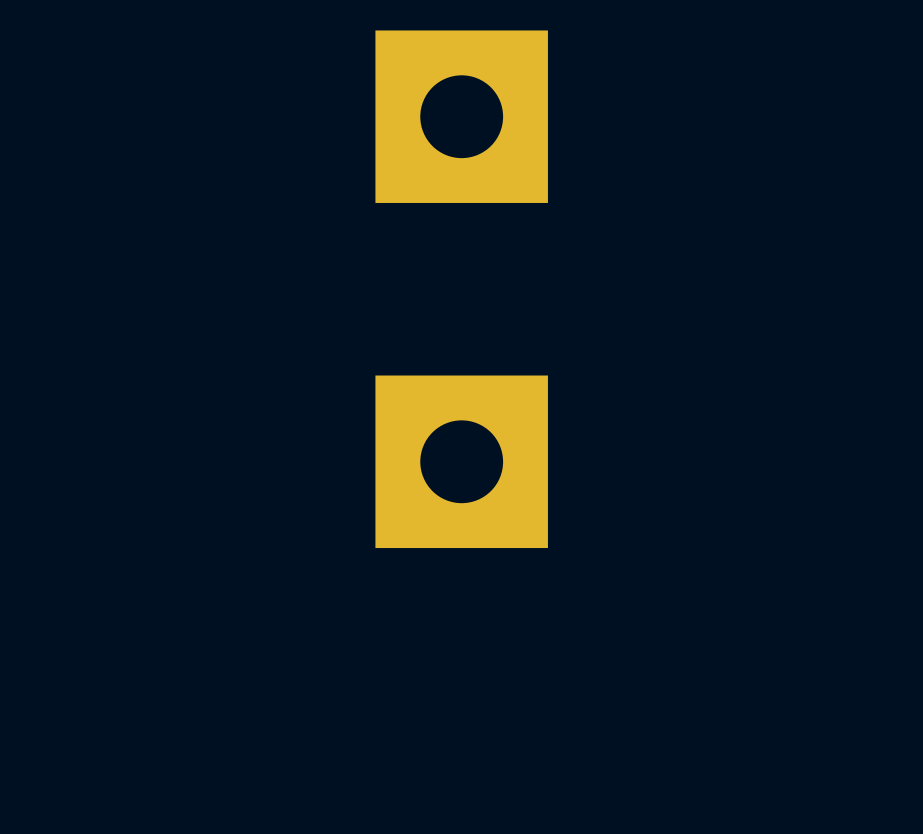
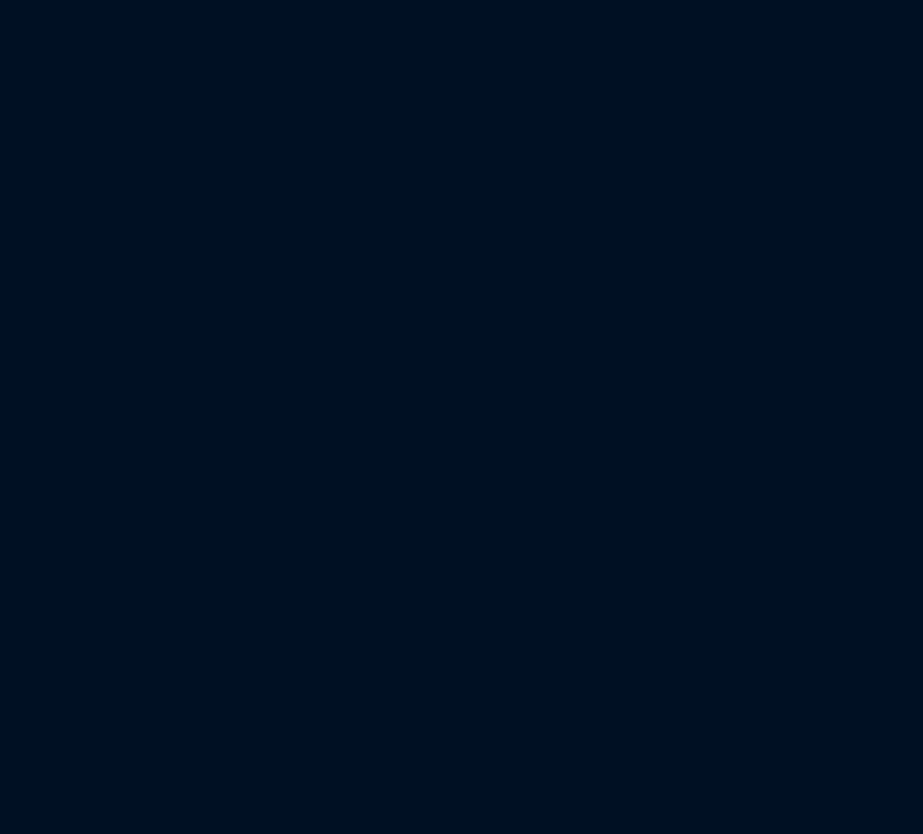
part: (461, 116) -> none
part: (461, 461) -> none

